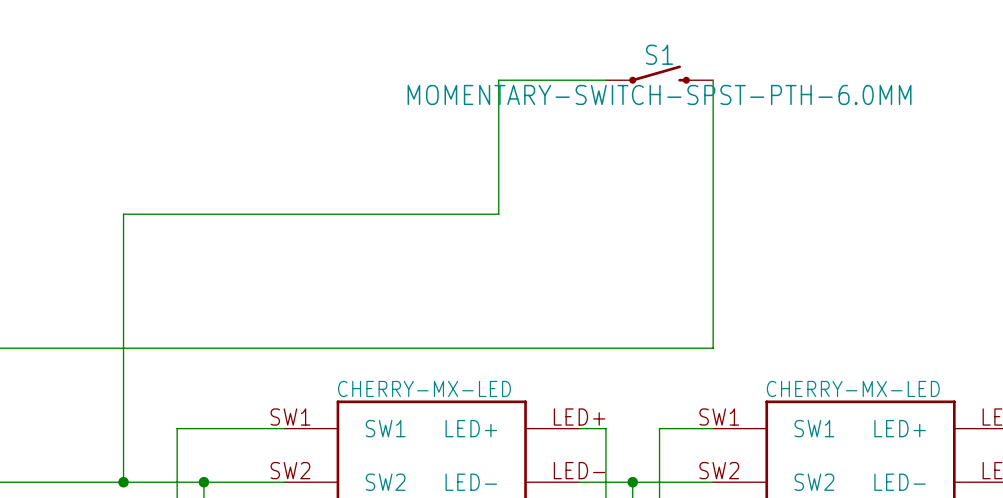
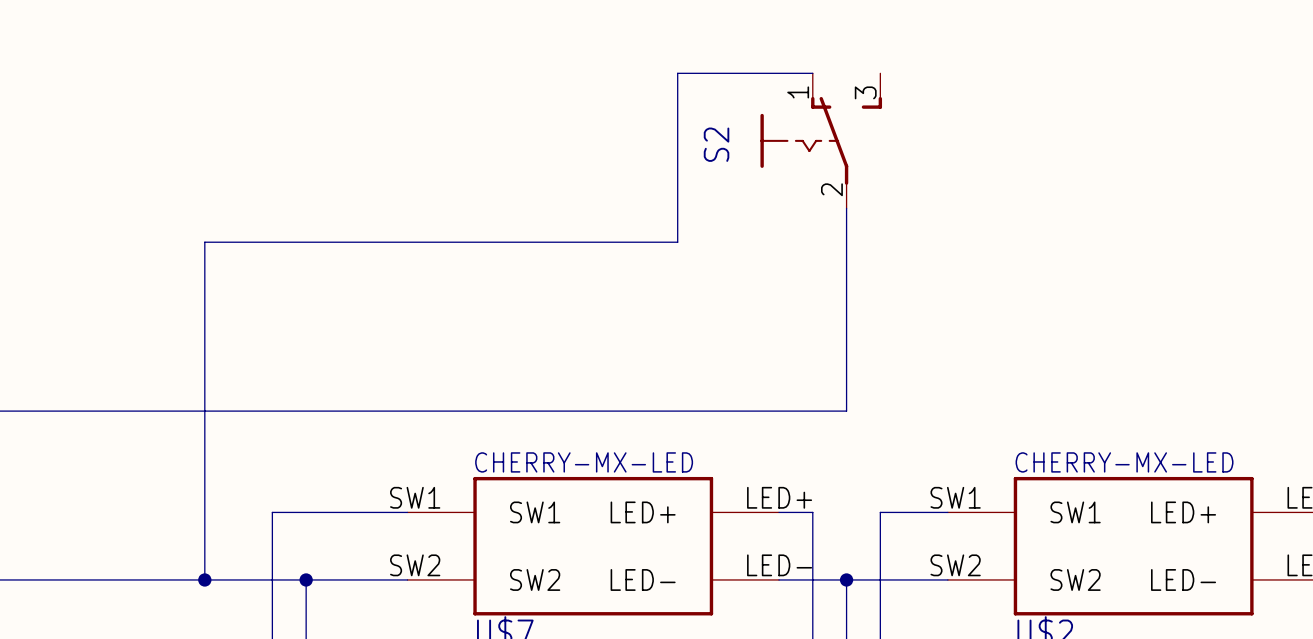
S1: MOMENTARY-SWITCH-SPST-PTH-6.0MM (659, 74) -> none
wire: (713, 80) (713, 348) (632, 348) -> (846, 208) (846, 411)
S2: none -> (821, 140)

